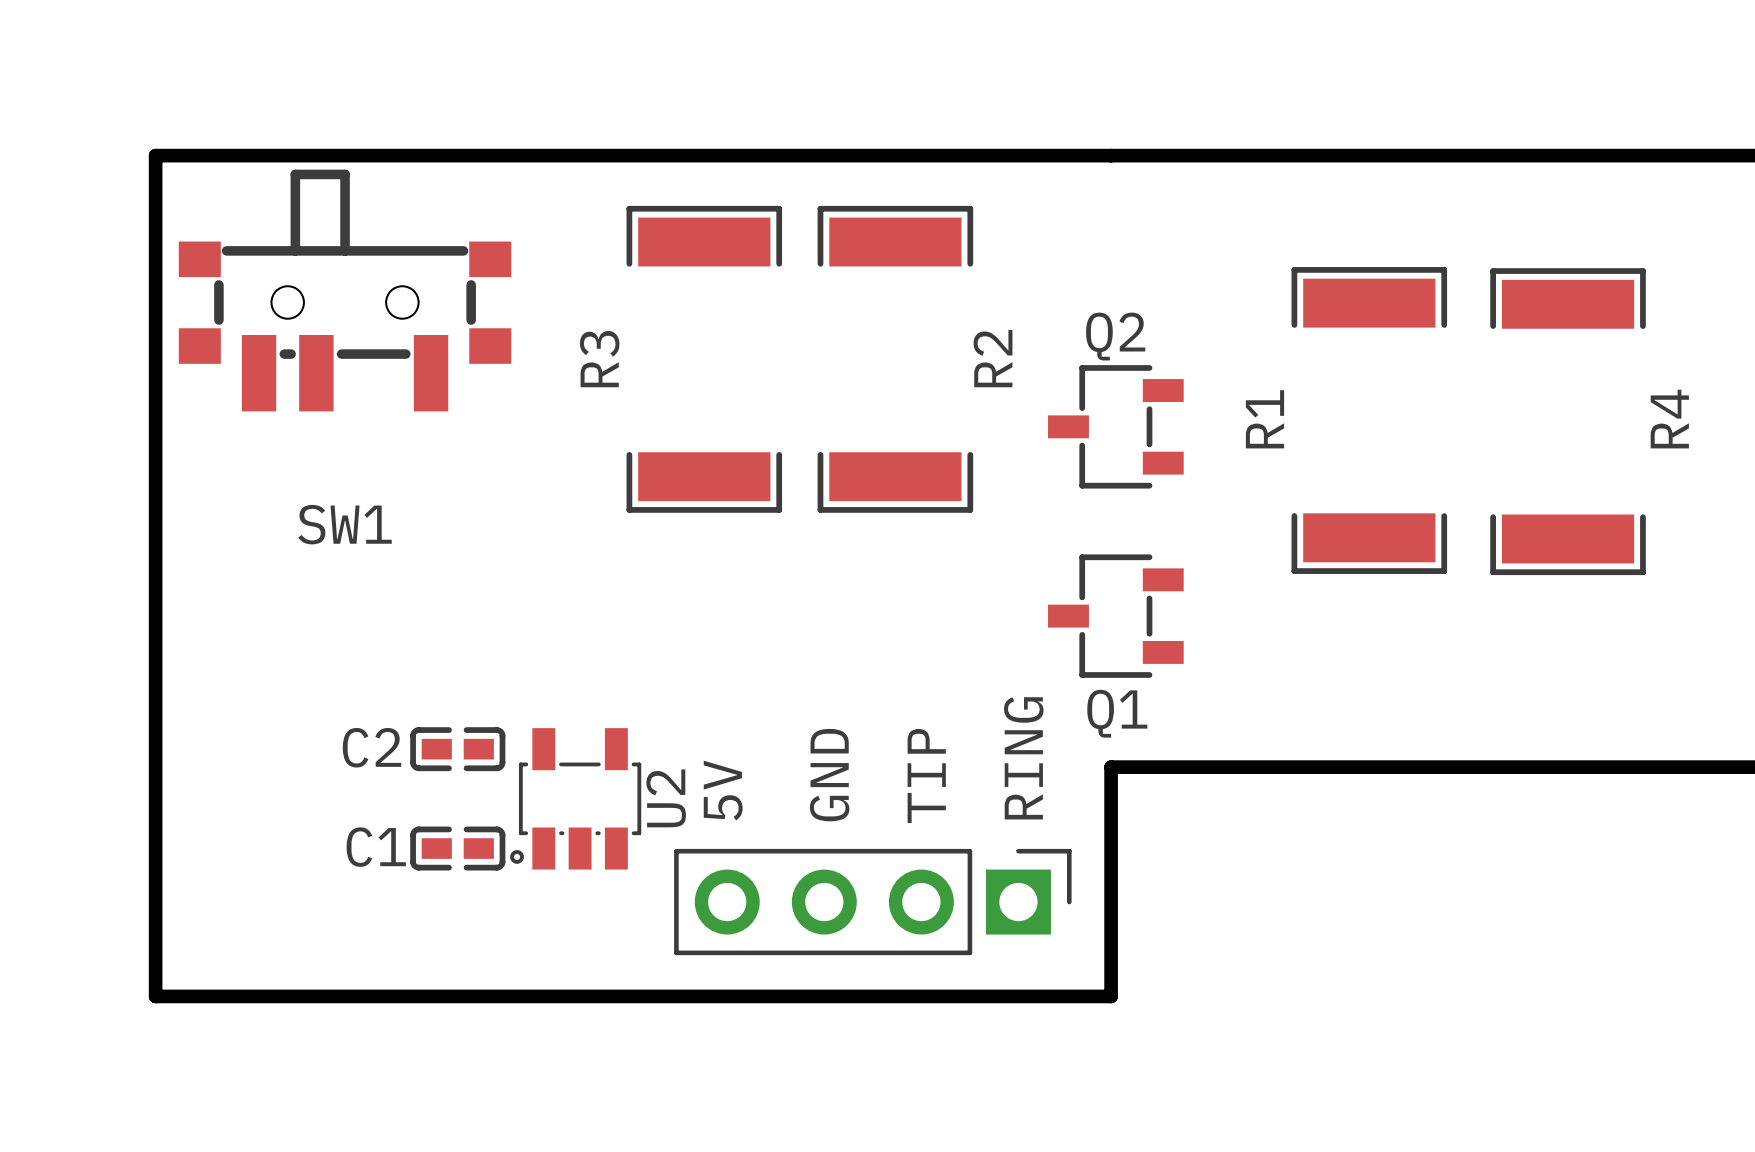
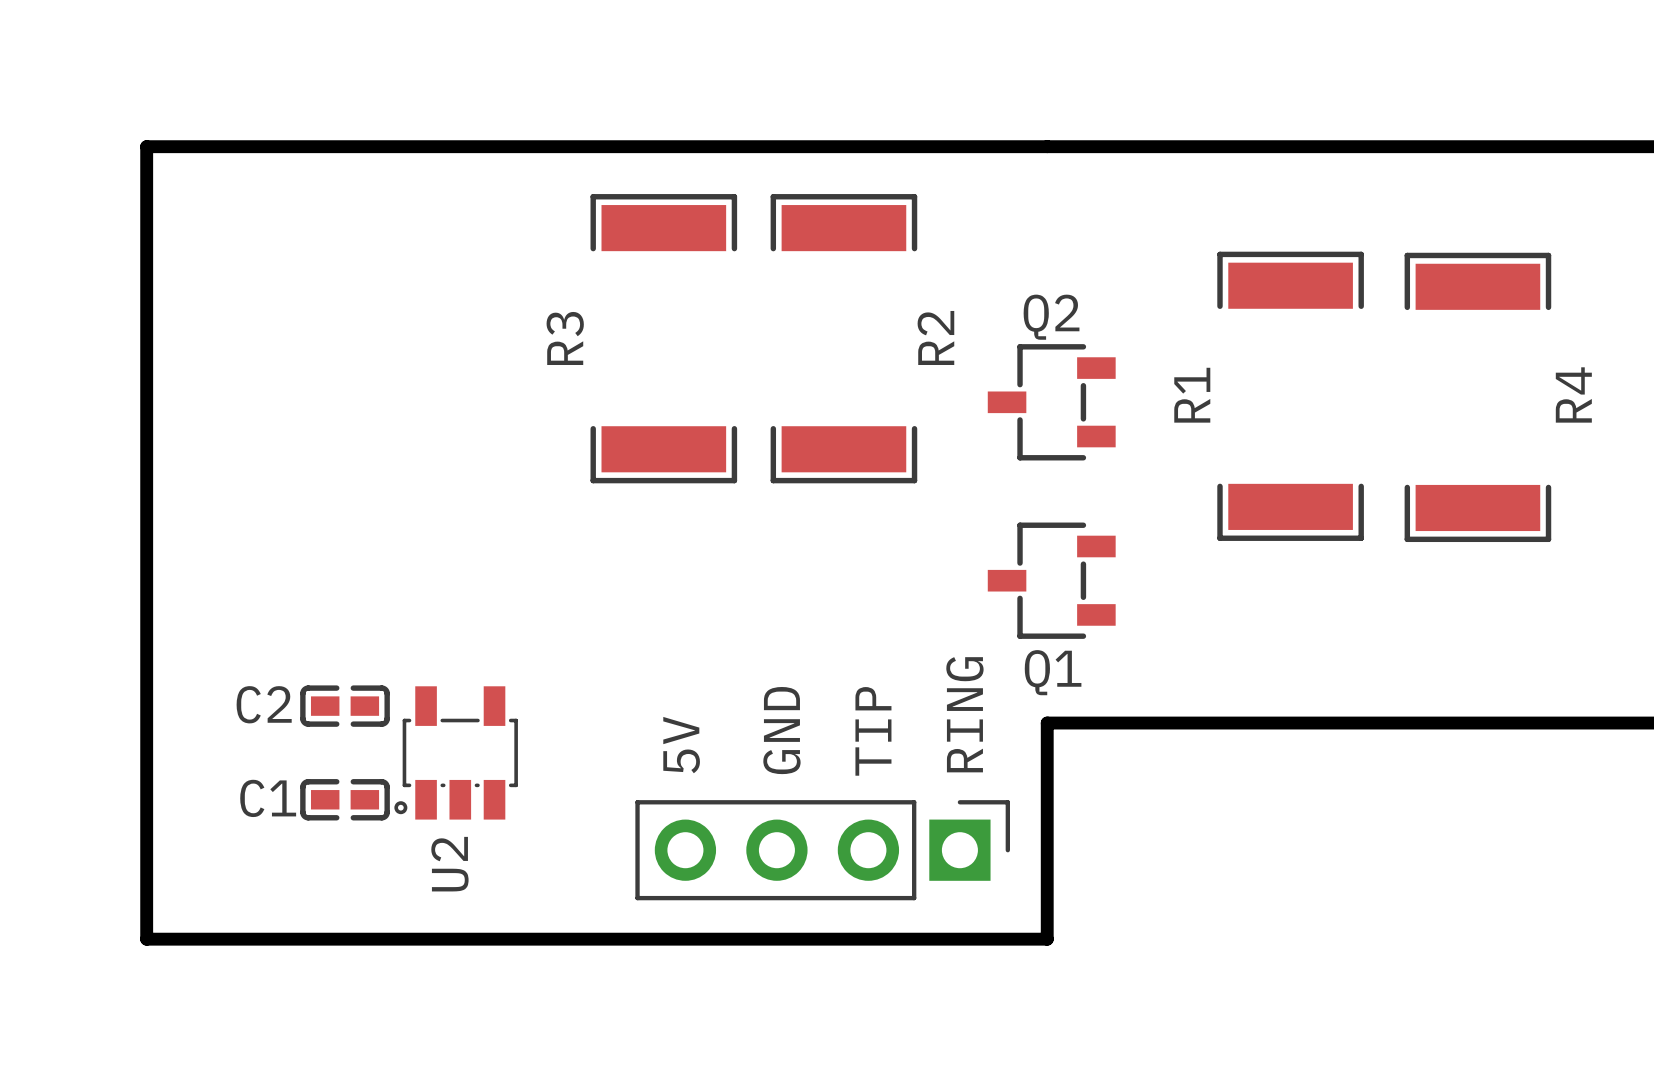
SW1: (345, 290) -> none
C2 position: (457, 749) -> (345, 706)
U2 position: (575, 798) -> (456, 752)
U2 name position: U2 (666, 798) -> U2 (449, 864)
C1 position: (457, 848) -> (345, 799)

